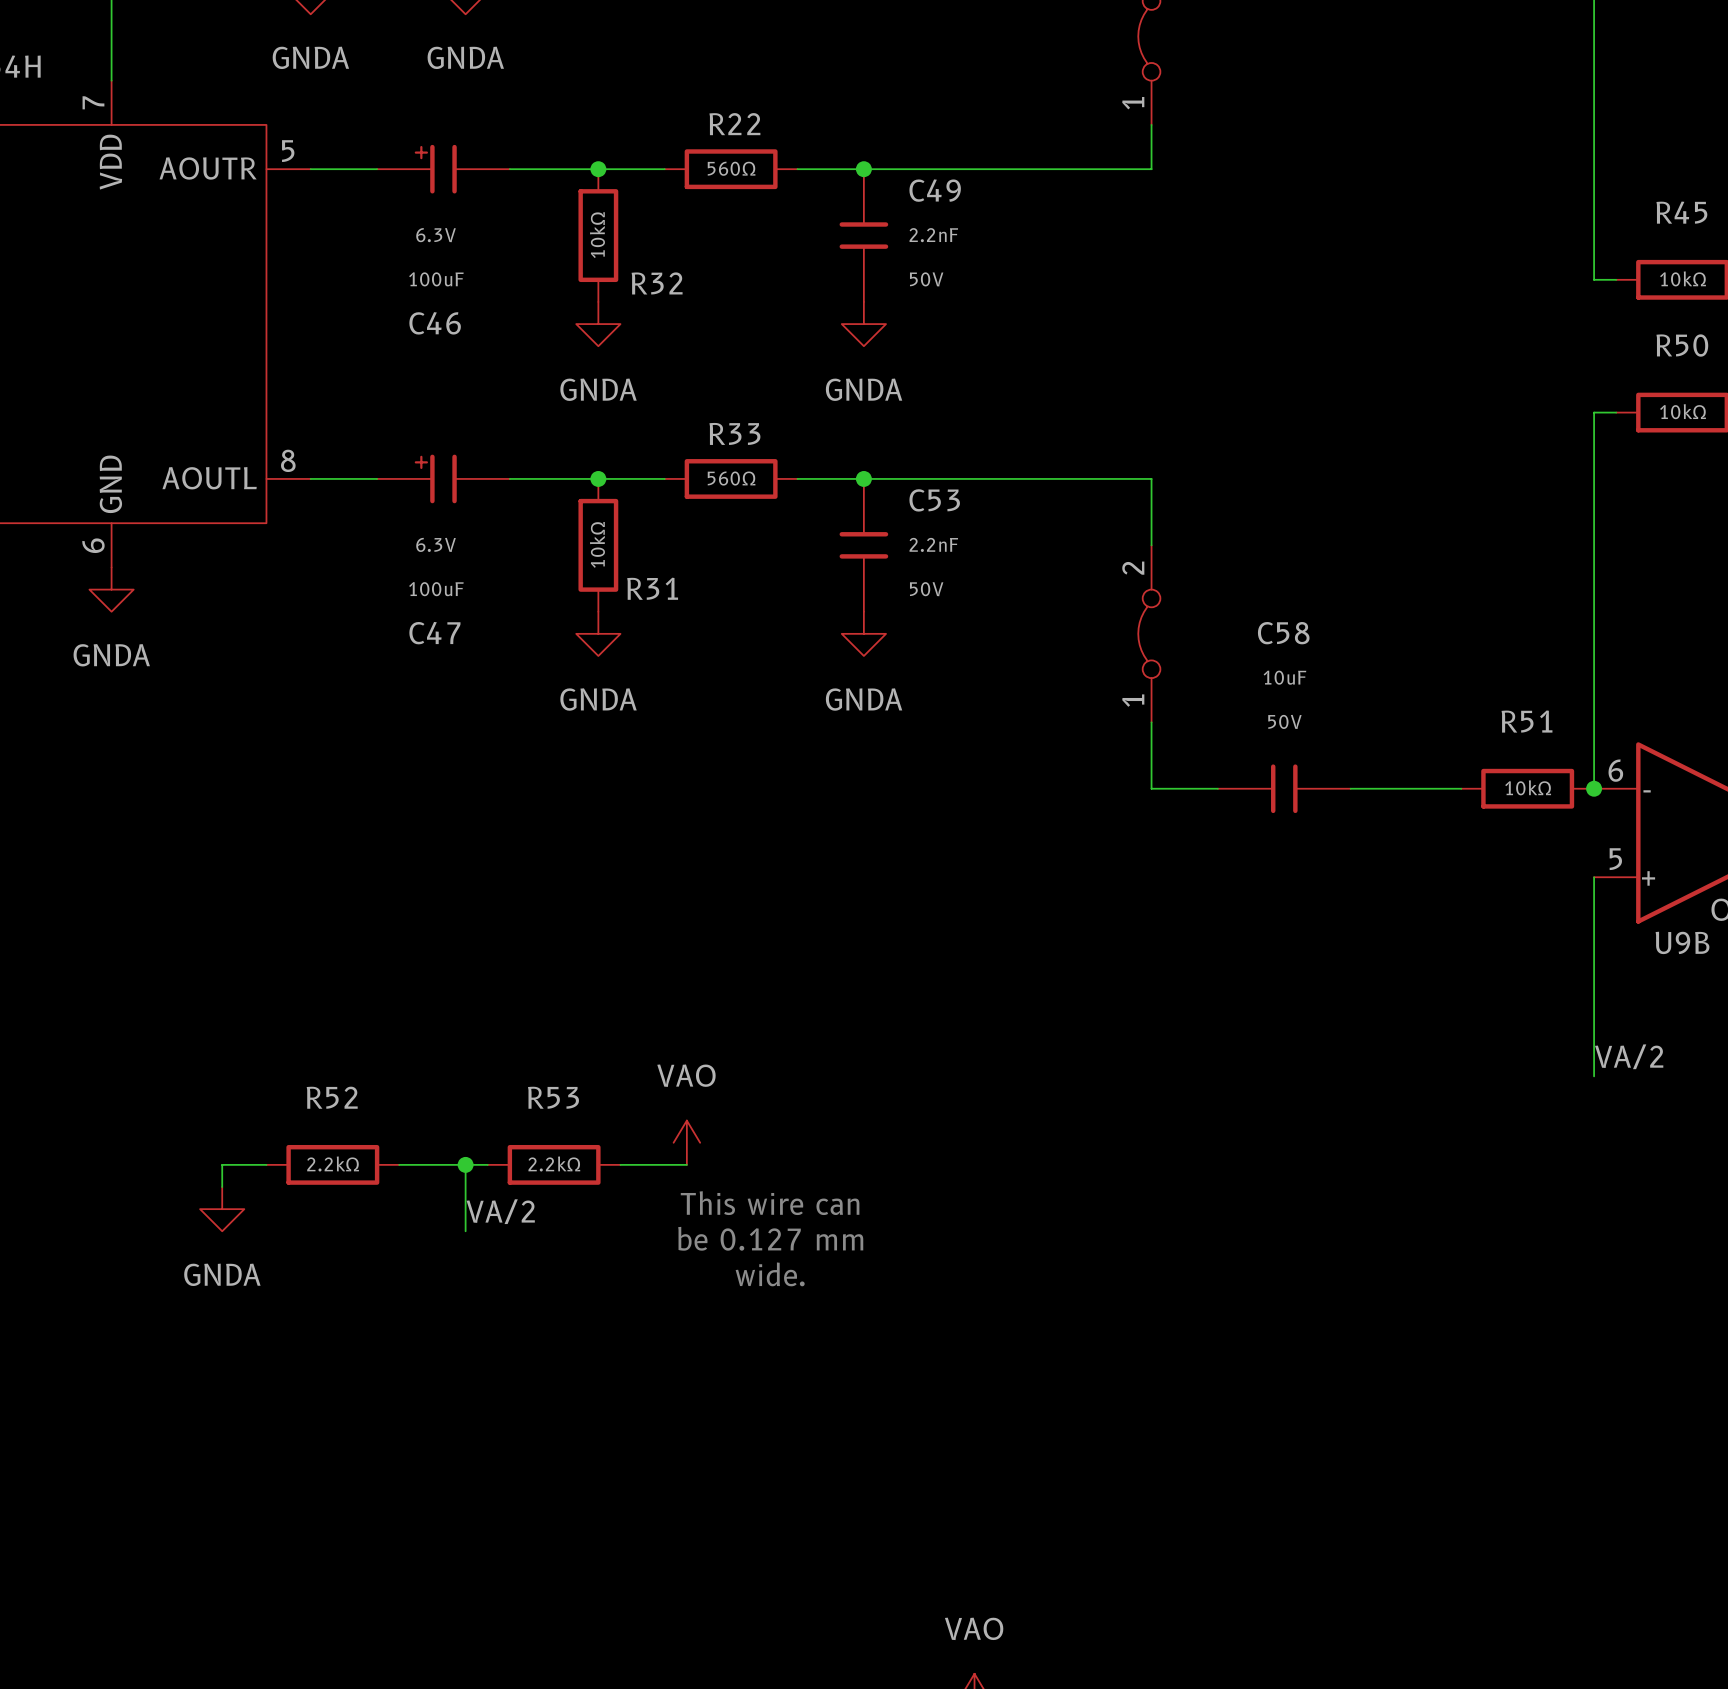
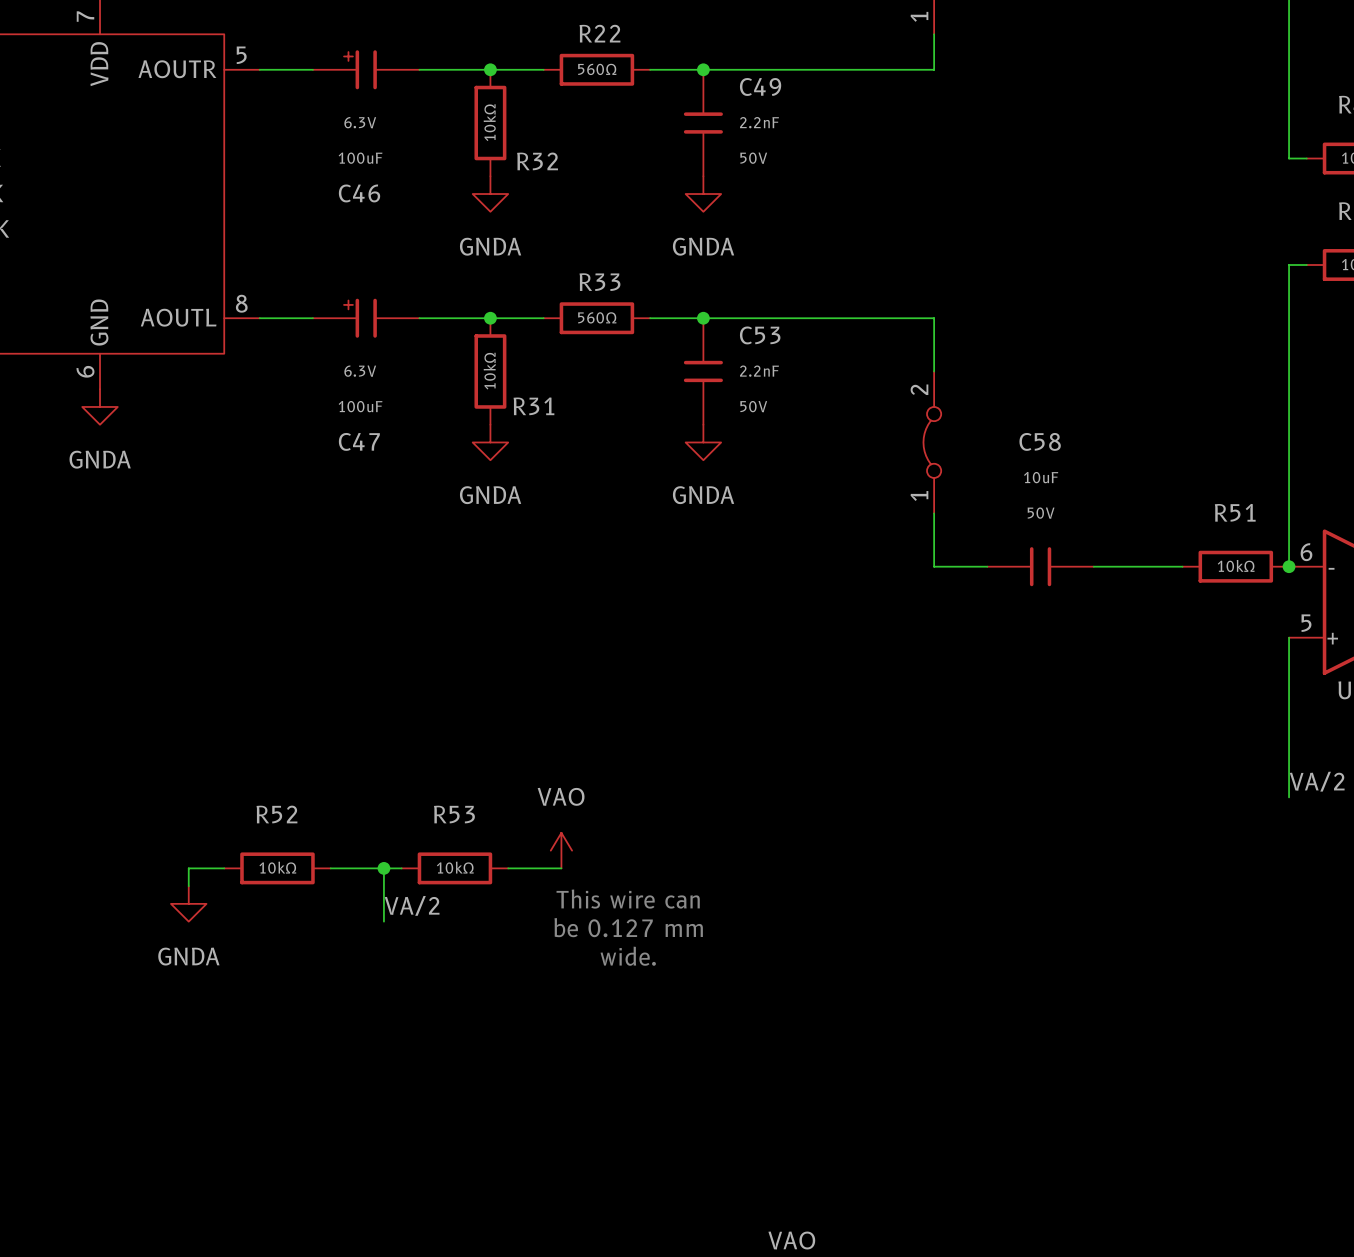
R52 value: 2.2kΩ (333, 1163) -> 10kΩ (277, 867)
R53 value: 2.2kΩ (554, 1163) -> 10kΩ (455, 867)

